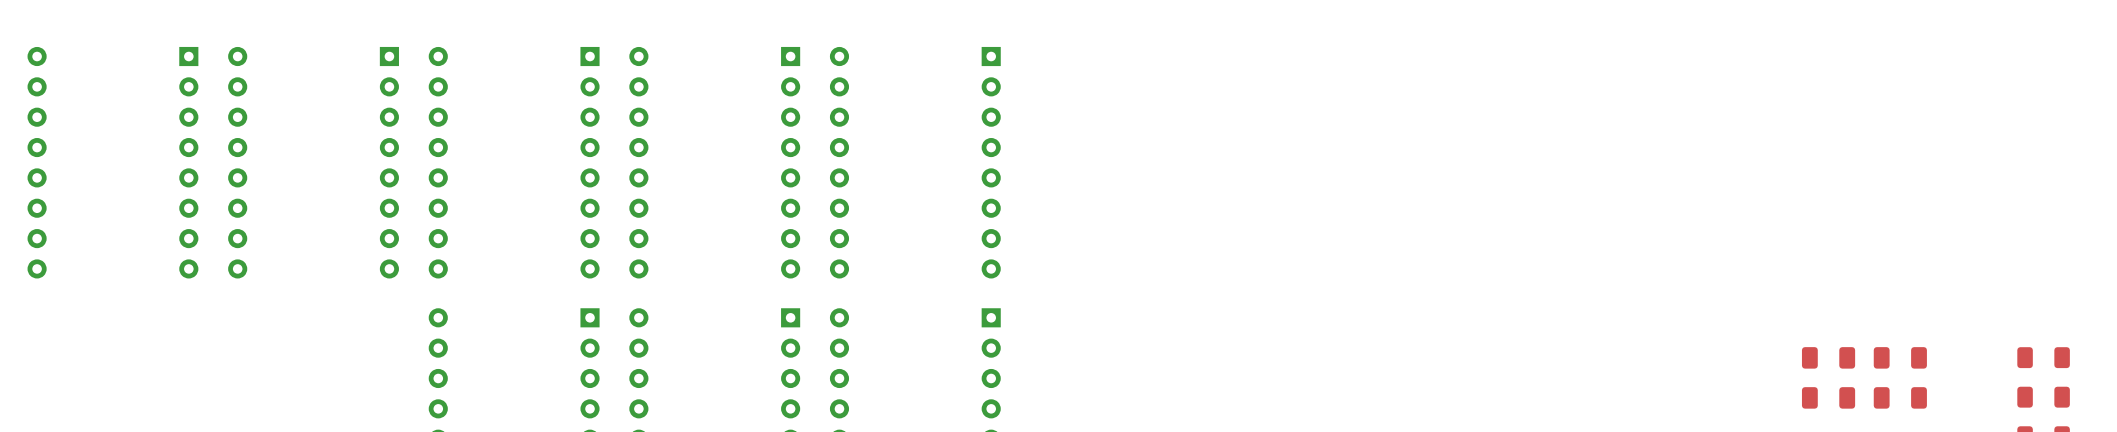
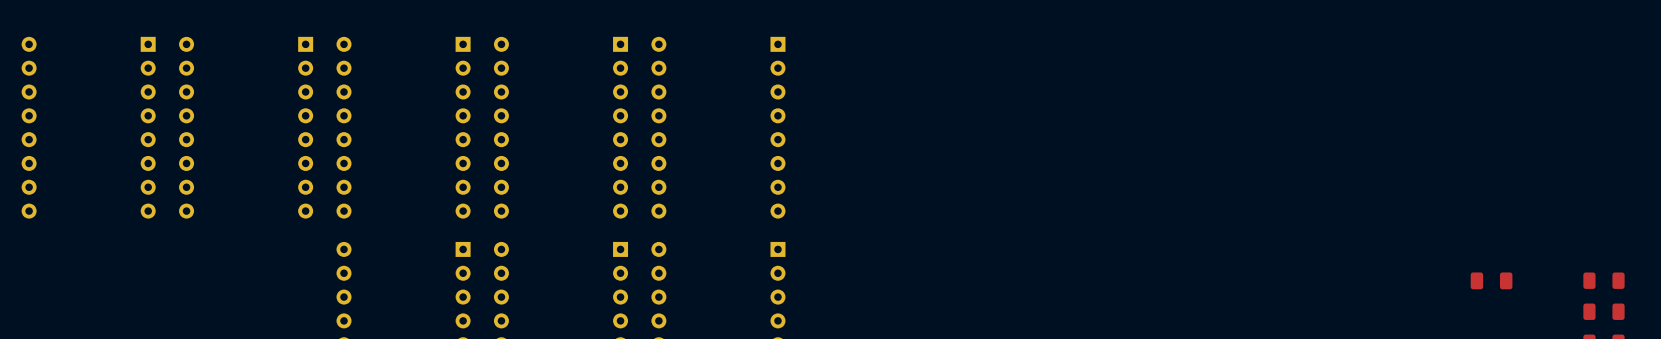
part: (1828, 357) -> none
part: (1828, 397) -> none
part: (1900, 397) -> none

